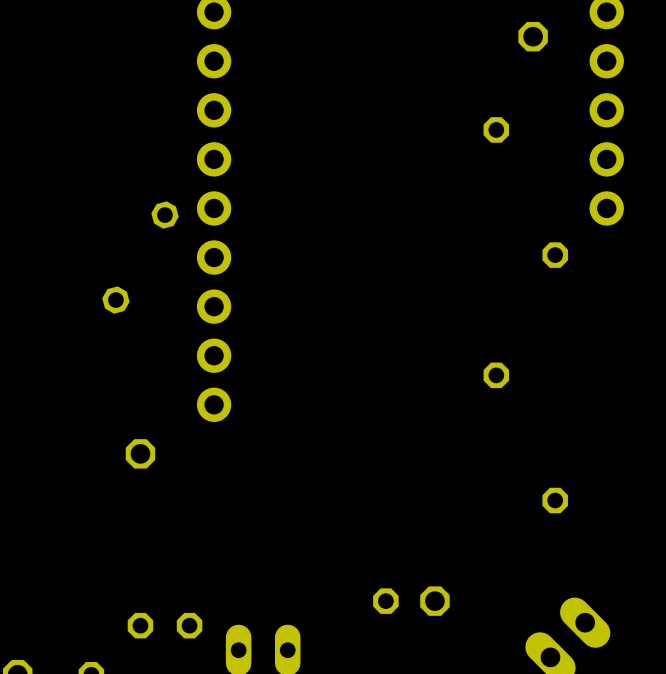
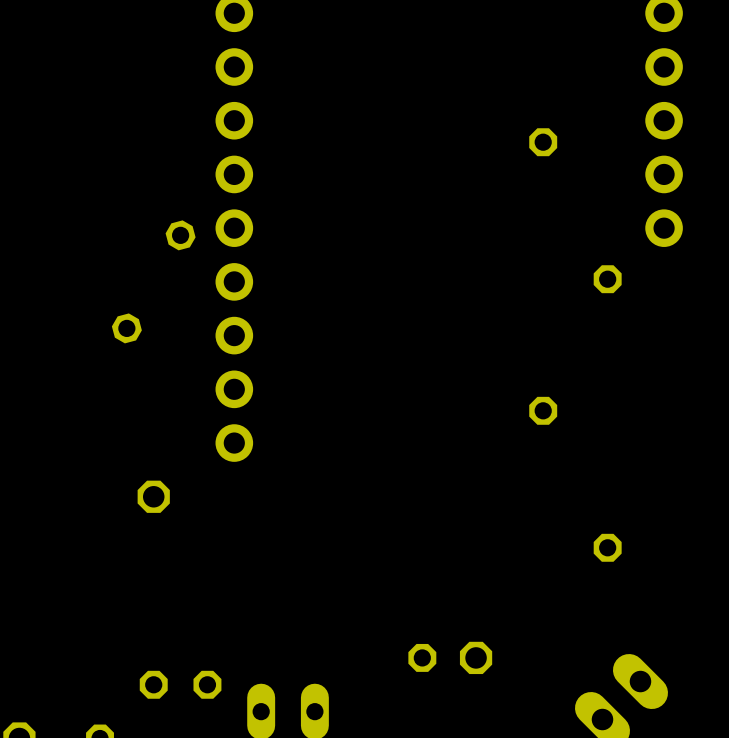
part: (533, 36) -> none

